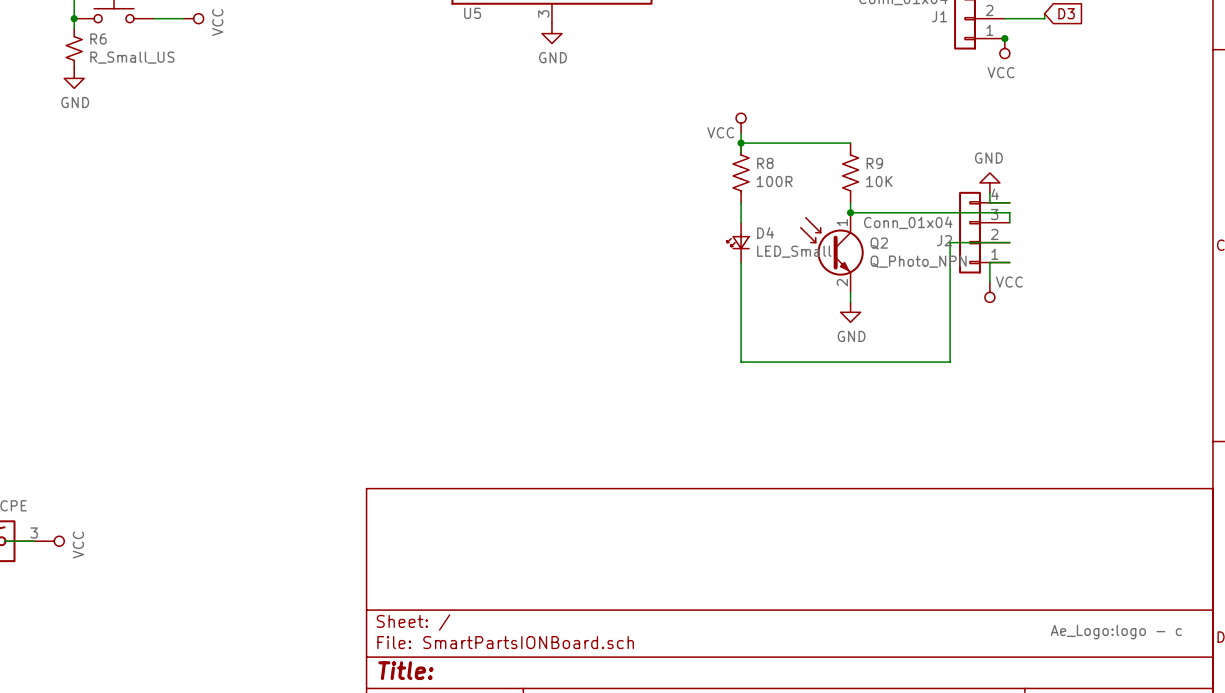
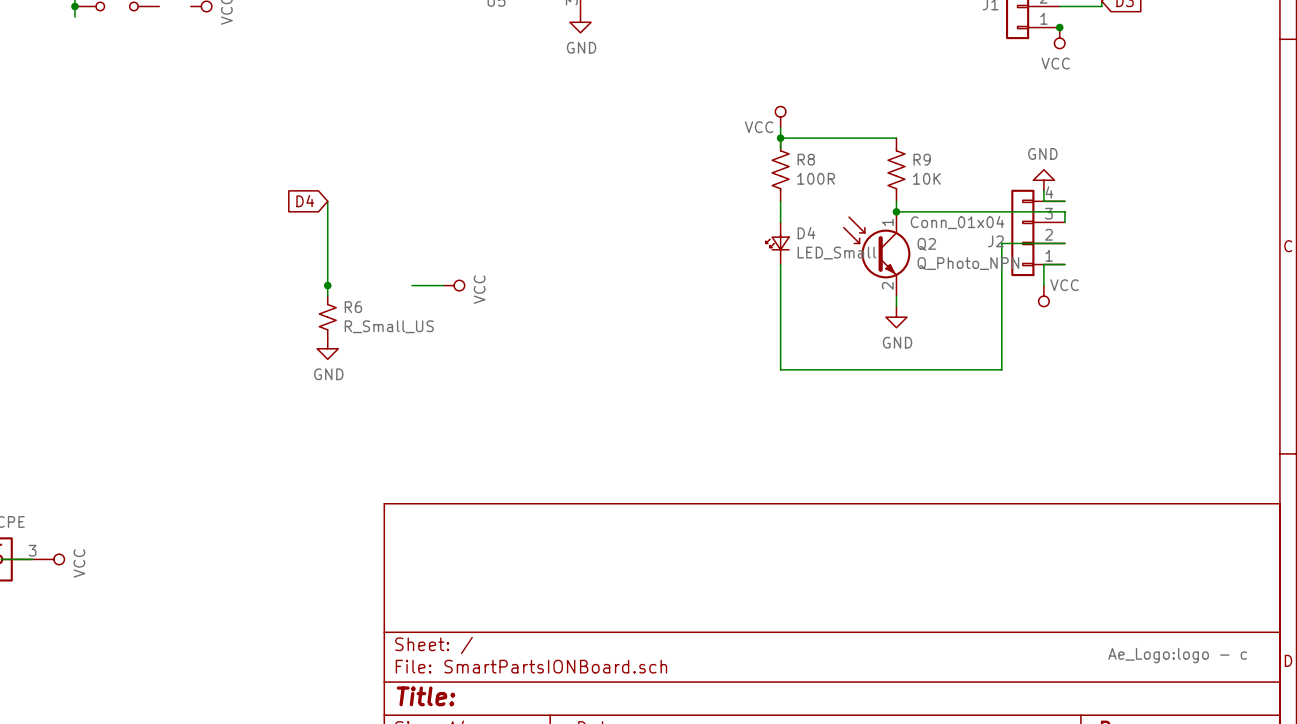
wire: (153, 18) (183, 18) -> none
R6 position: (74, 48) -> (327, 317)
power symbol: GND (74, 78) -> none
global label: none -> D4 (305, 201)
wire: none -> (327, 201) (327, 296)
junction: none -> (327, 285)
wire: none -> (411, 285) (443, 285)
power symbol: none -> VCC (454, 285)
power symbol: none -> GND (327, 348)

